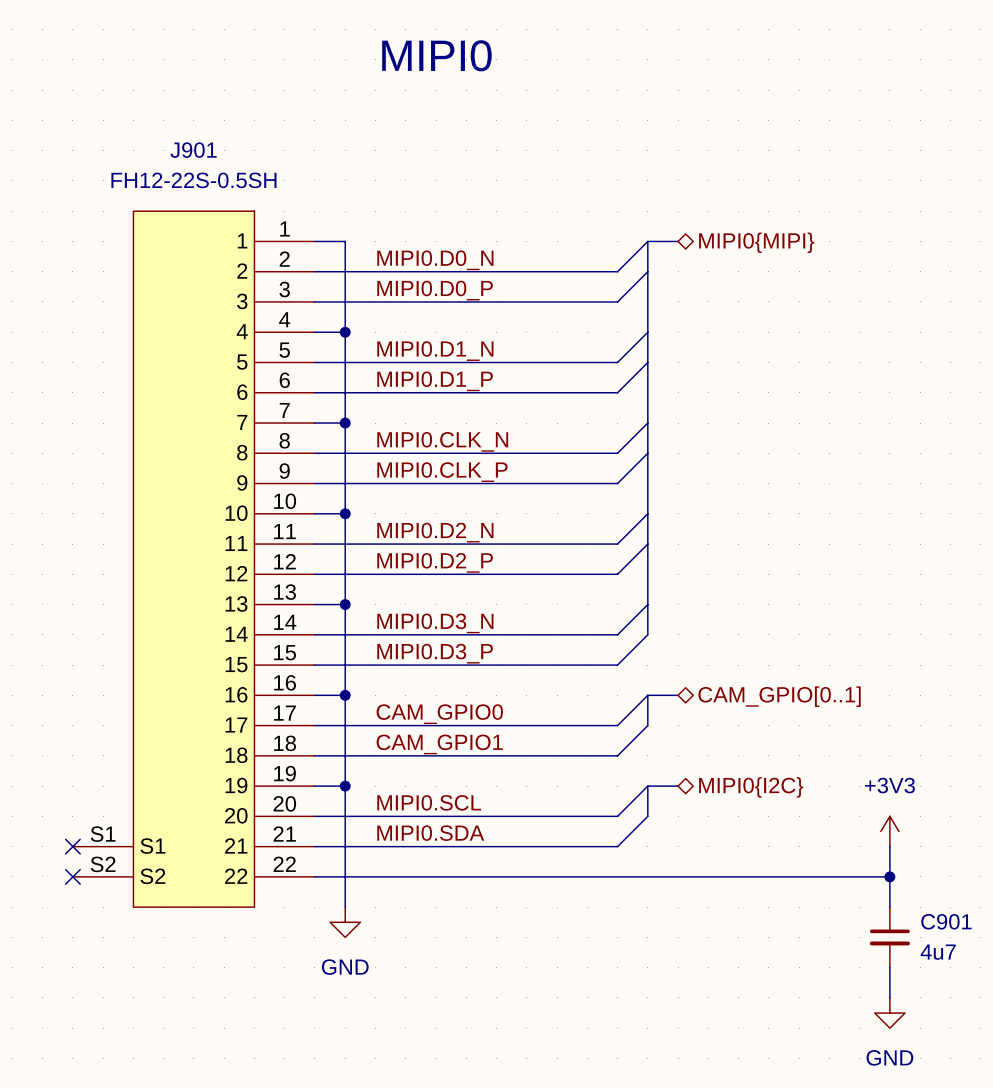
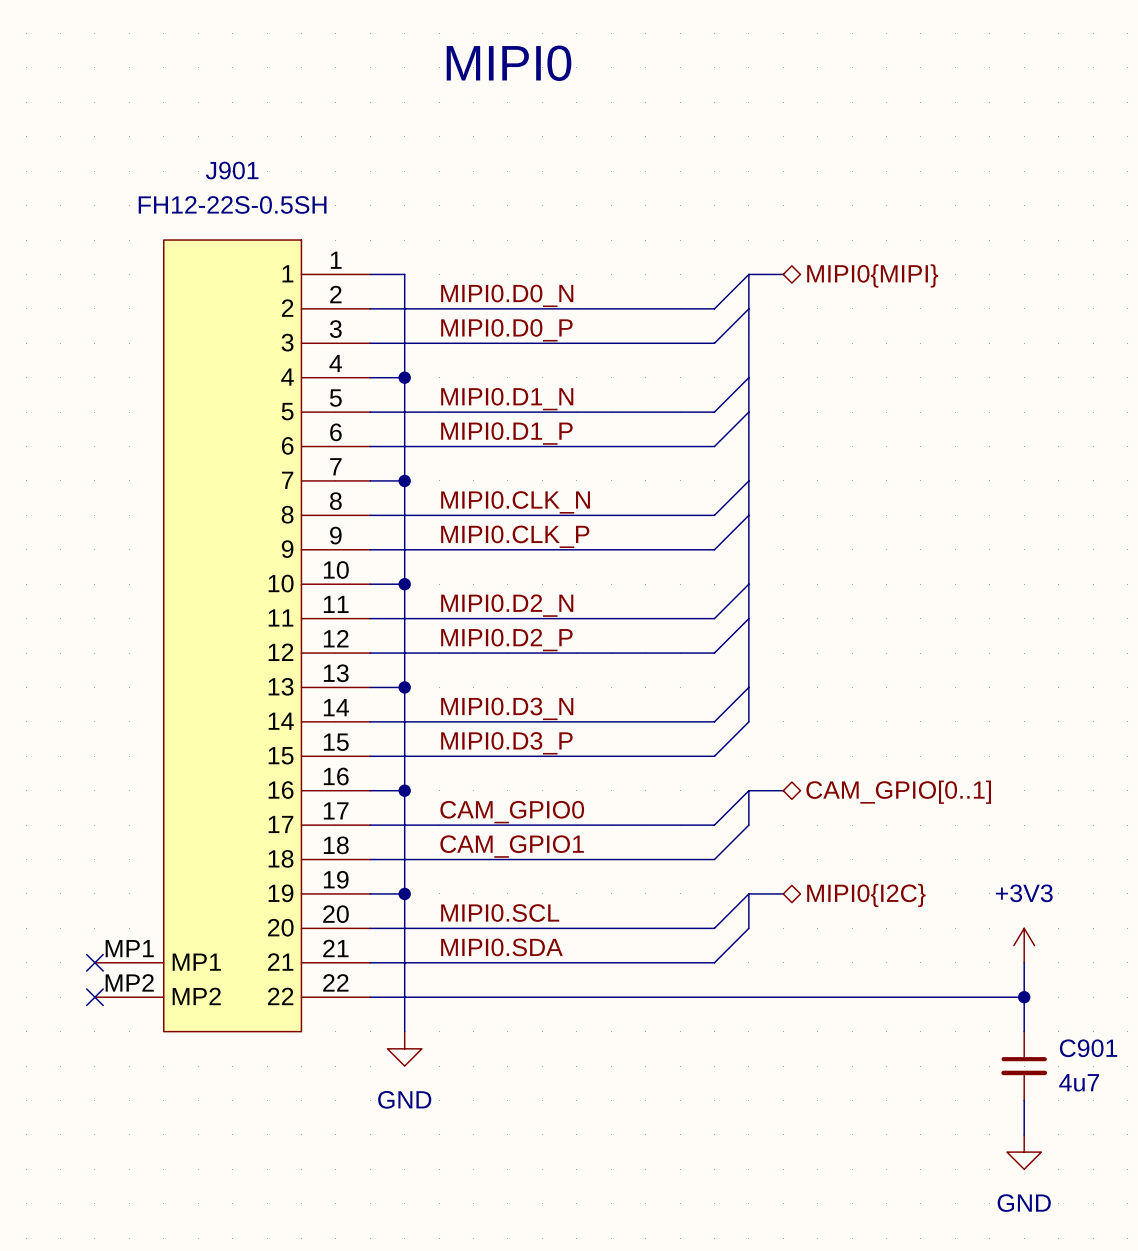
J901 pin number: S1 (103, 834) -> MP1 (129, 948)
J901 pin name: S1 (152, 846) -> MP1 (196, 962)
J901 pin number: S2 (103, 864) -> MP2 (129, 982)
J901 pin name: S2 (152, 876) -> MP2 (196, 996)

